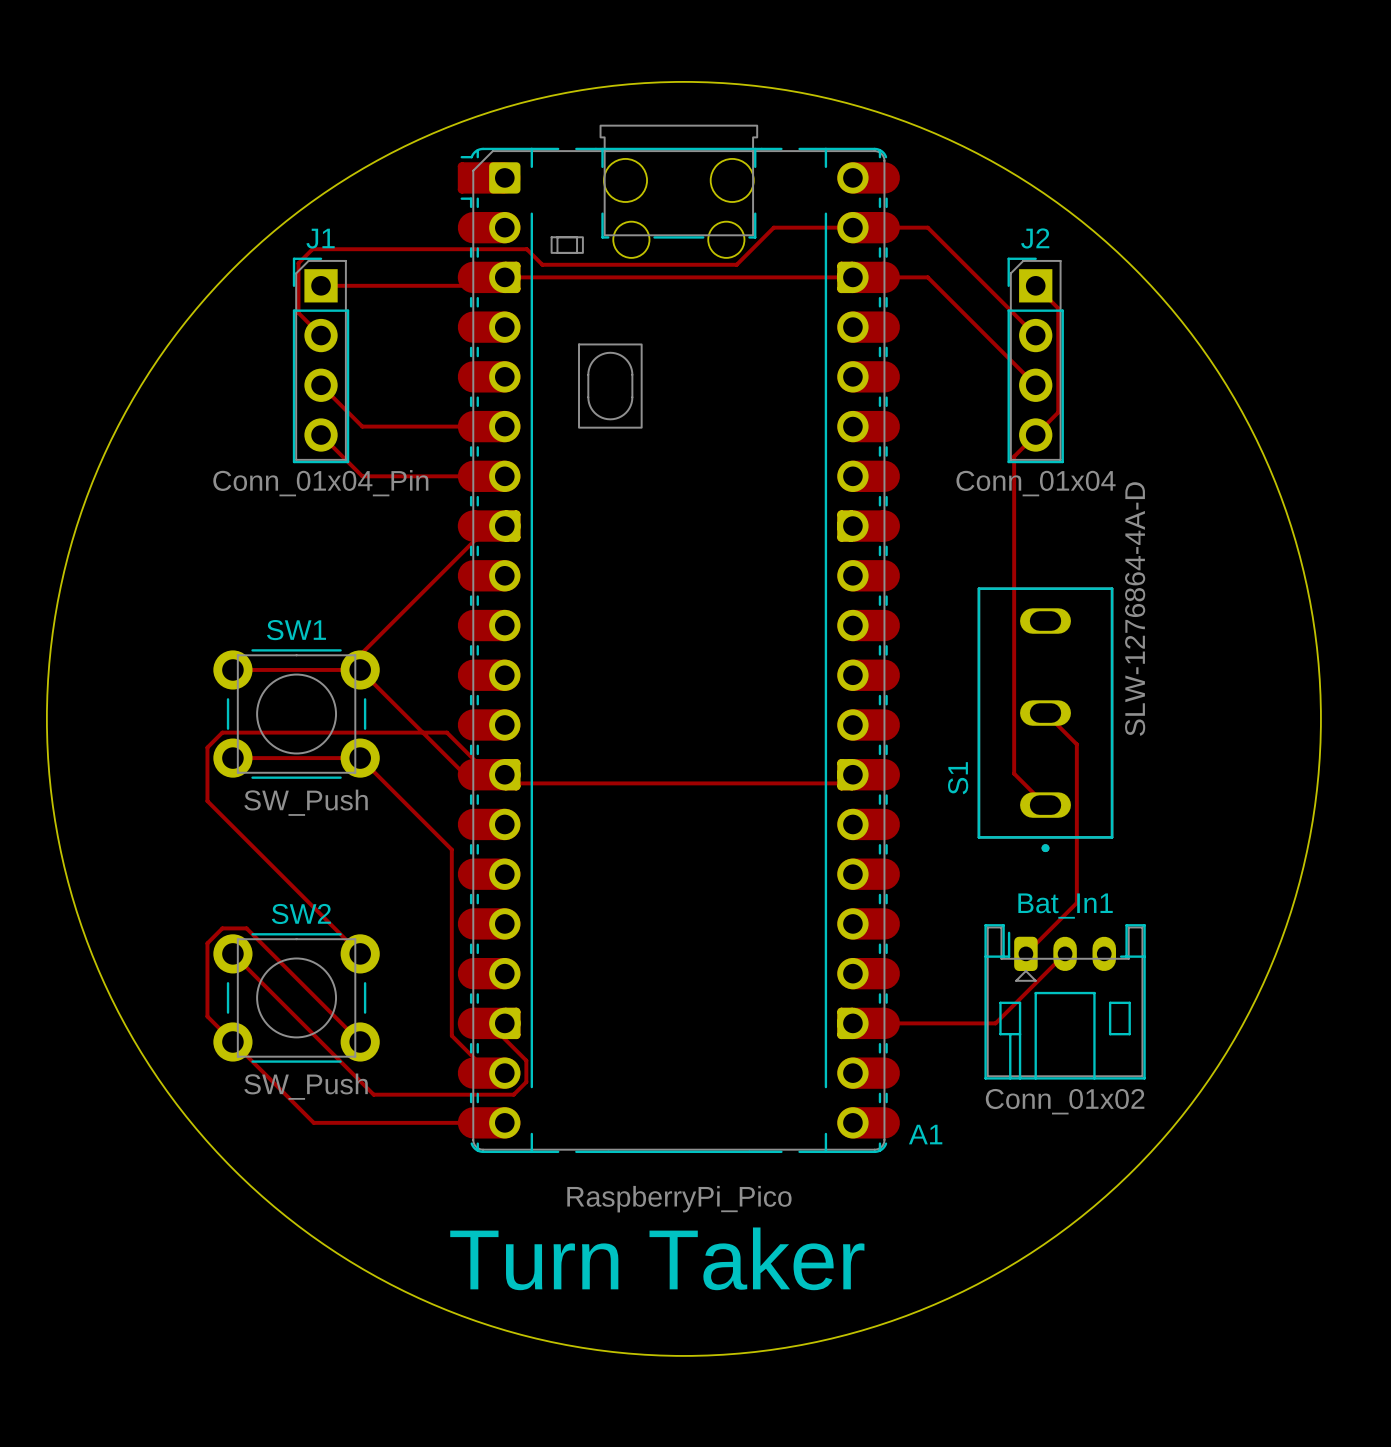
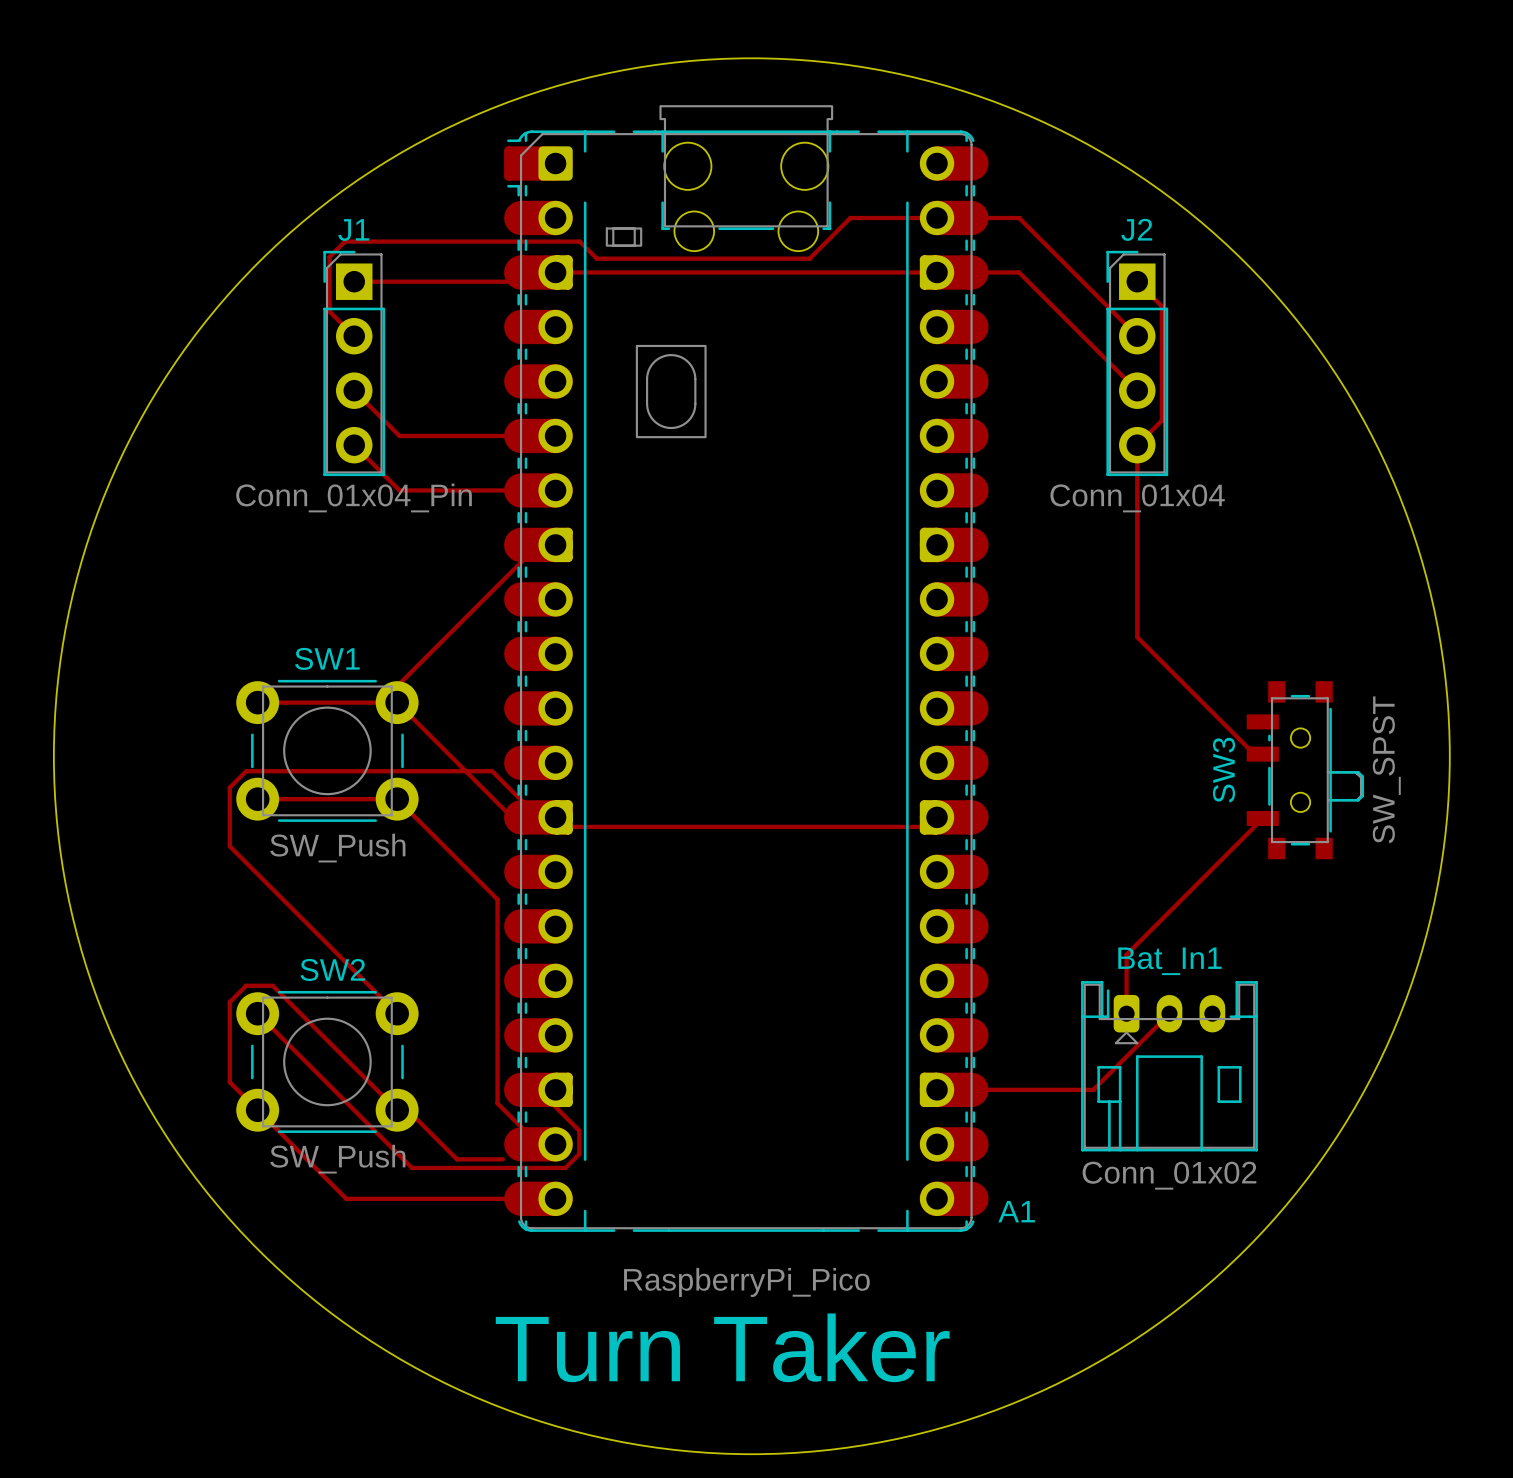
track: (1035, 435) (1014, 456) (1014, 773) (1045, 805) (1055, 805) -> (1137, 445) (1137, 637) (1254, 754) (1262, 754)
track: (1045, 713) (1076, 744) (1076, 902) (1025, 953) -> (1262, 818) (1126, 954) (1126, 1013)
S1: SLW-1276864-4A-D (1045, 719) -> none
SW3: none -> SW_SPST (1305, 770)
track: none -> (407, 1110) (457, 1159) (502, 1159)

